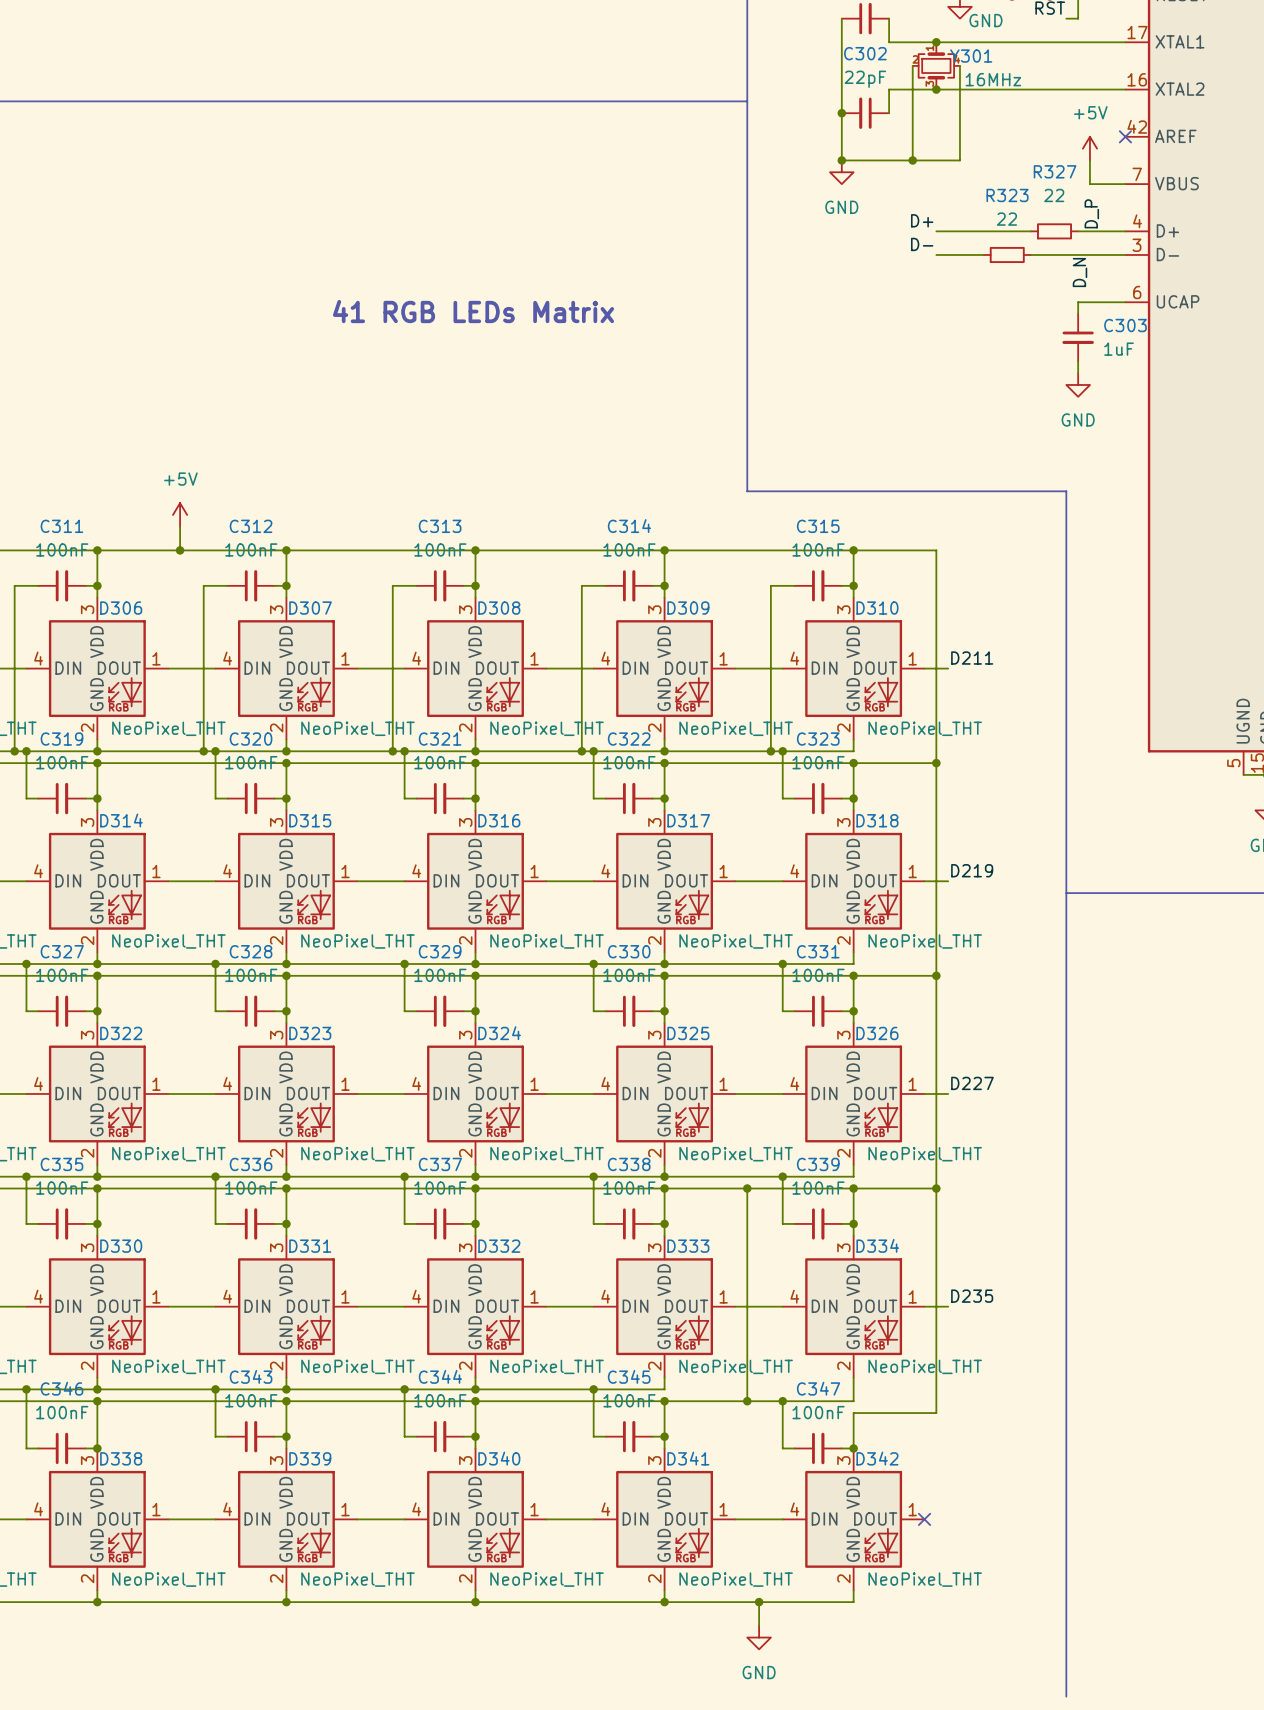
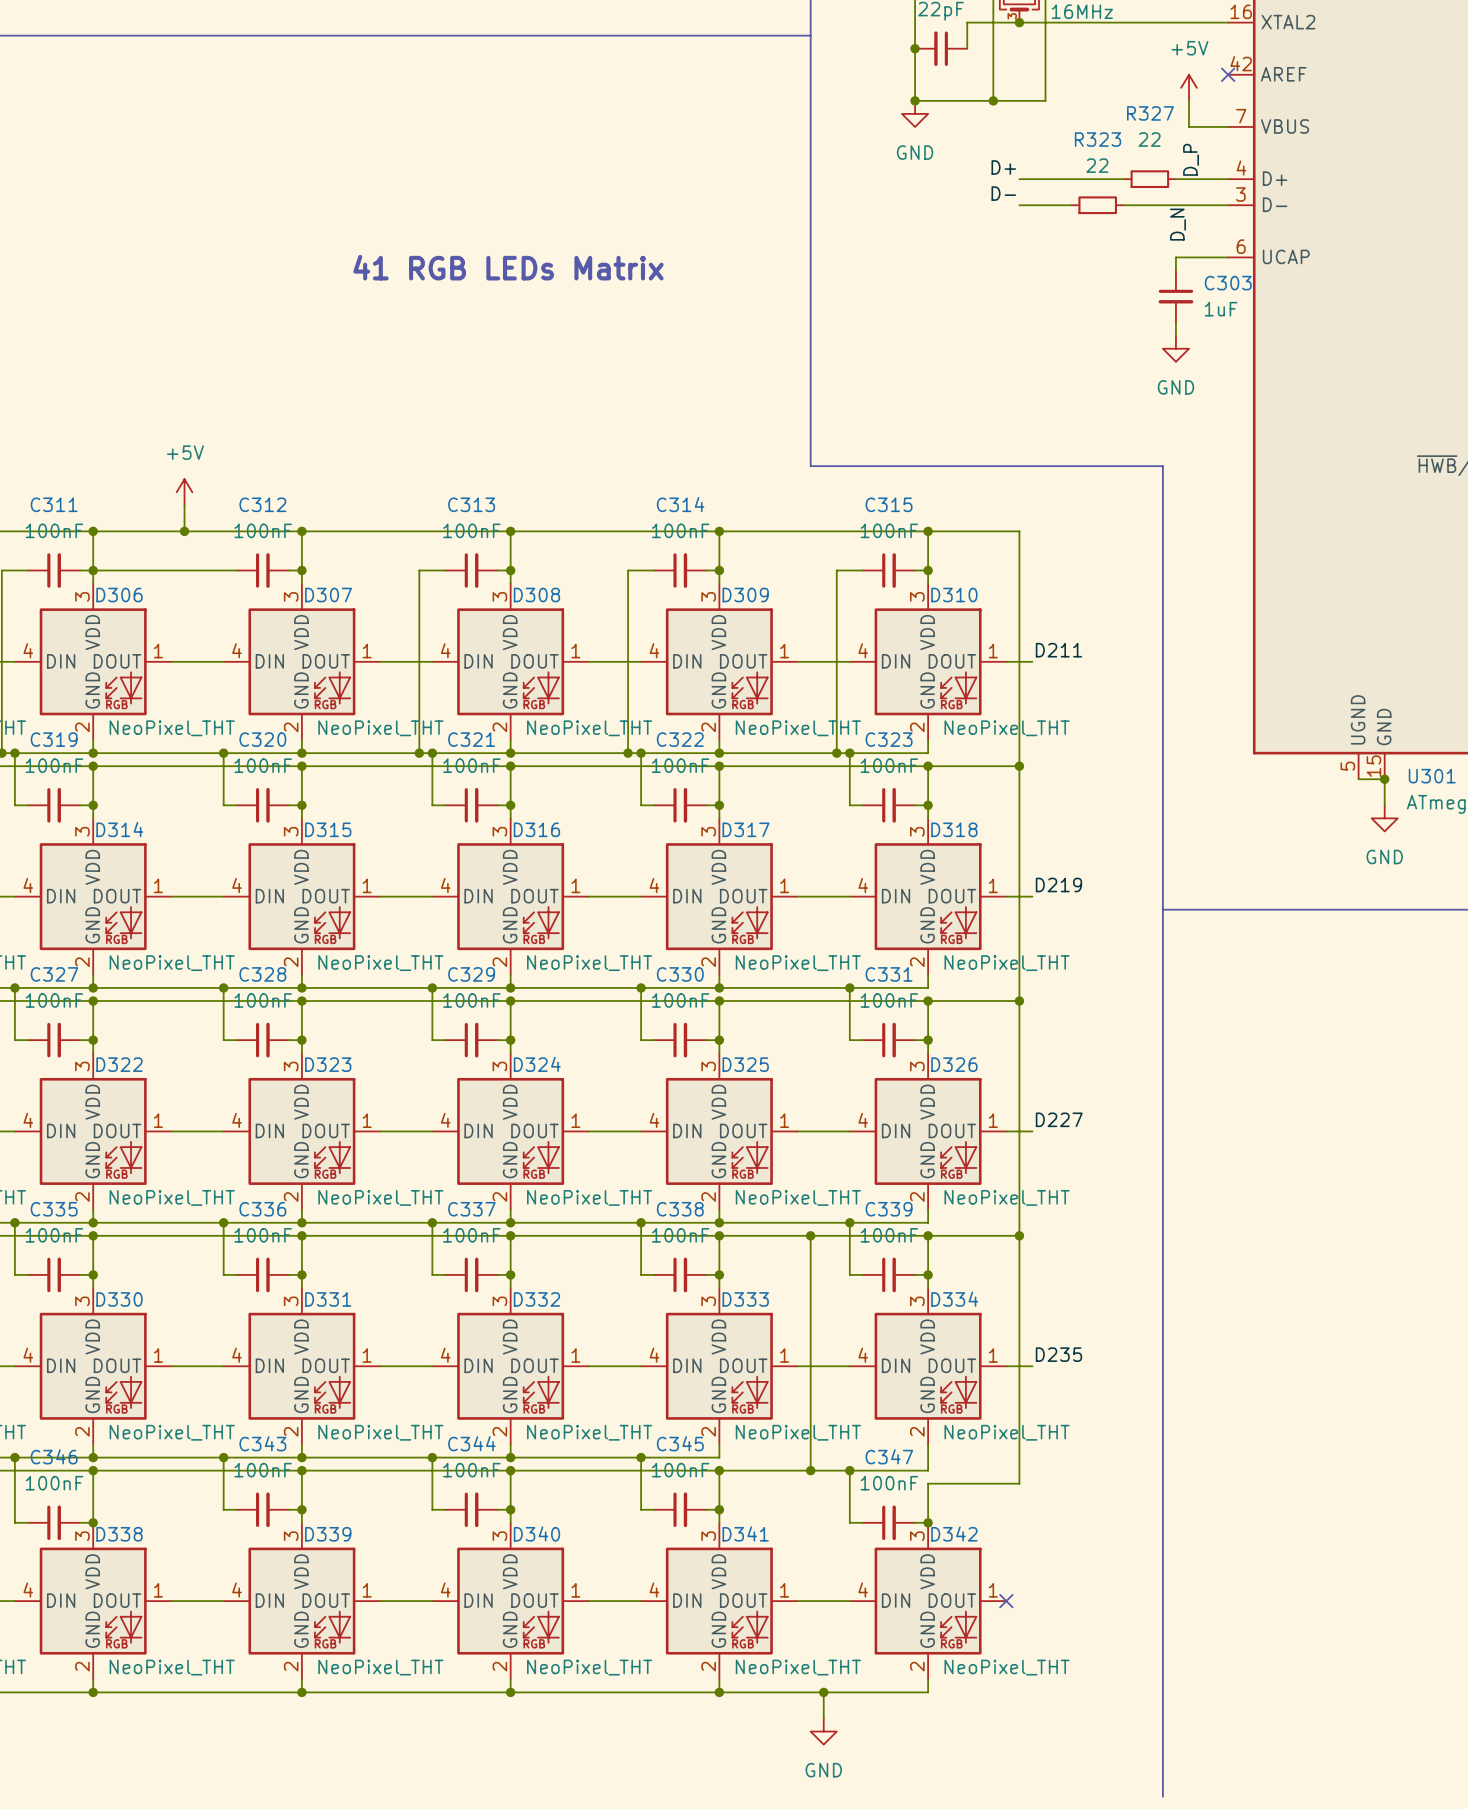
wire: (203, 585) (203, 751) -> (210, 570) (93, 570)
junction: (203, 751) -> none

